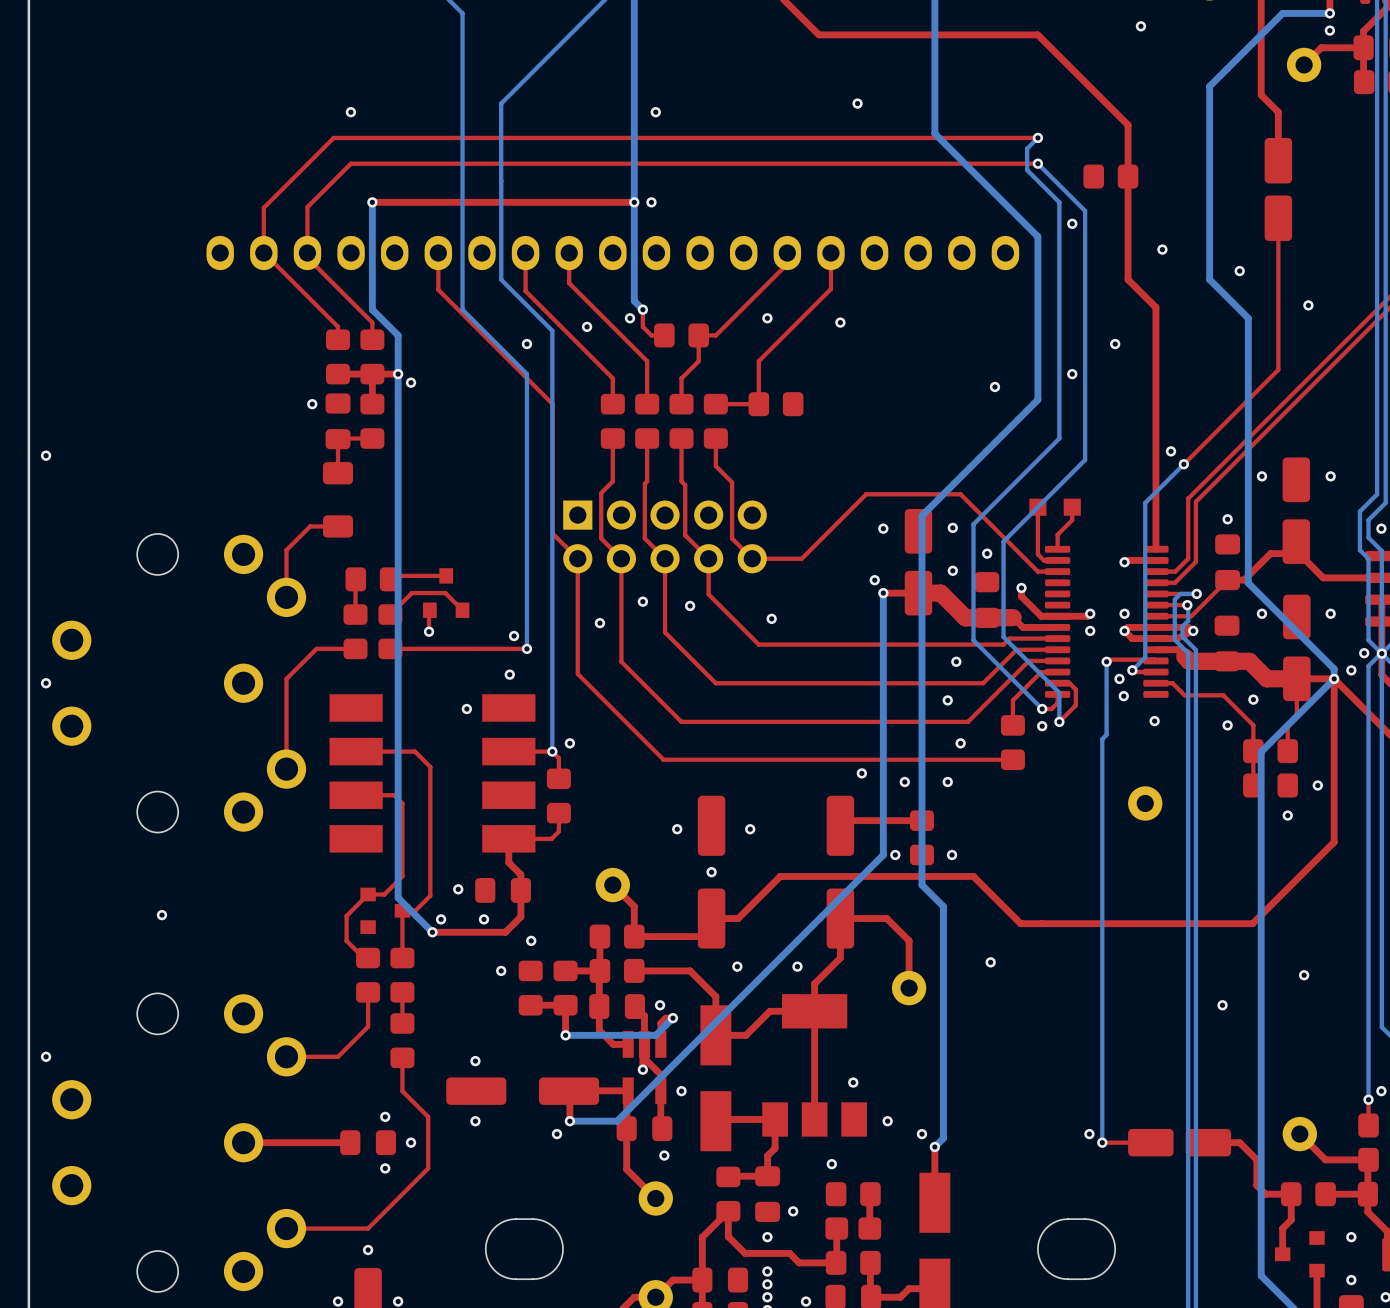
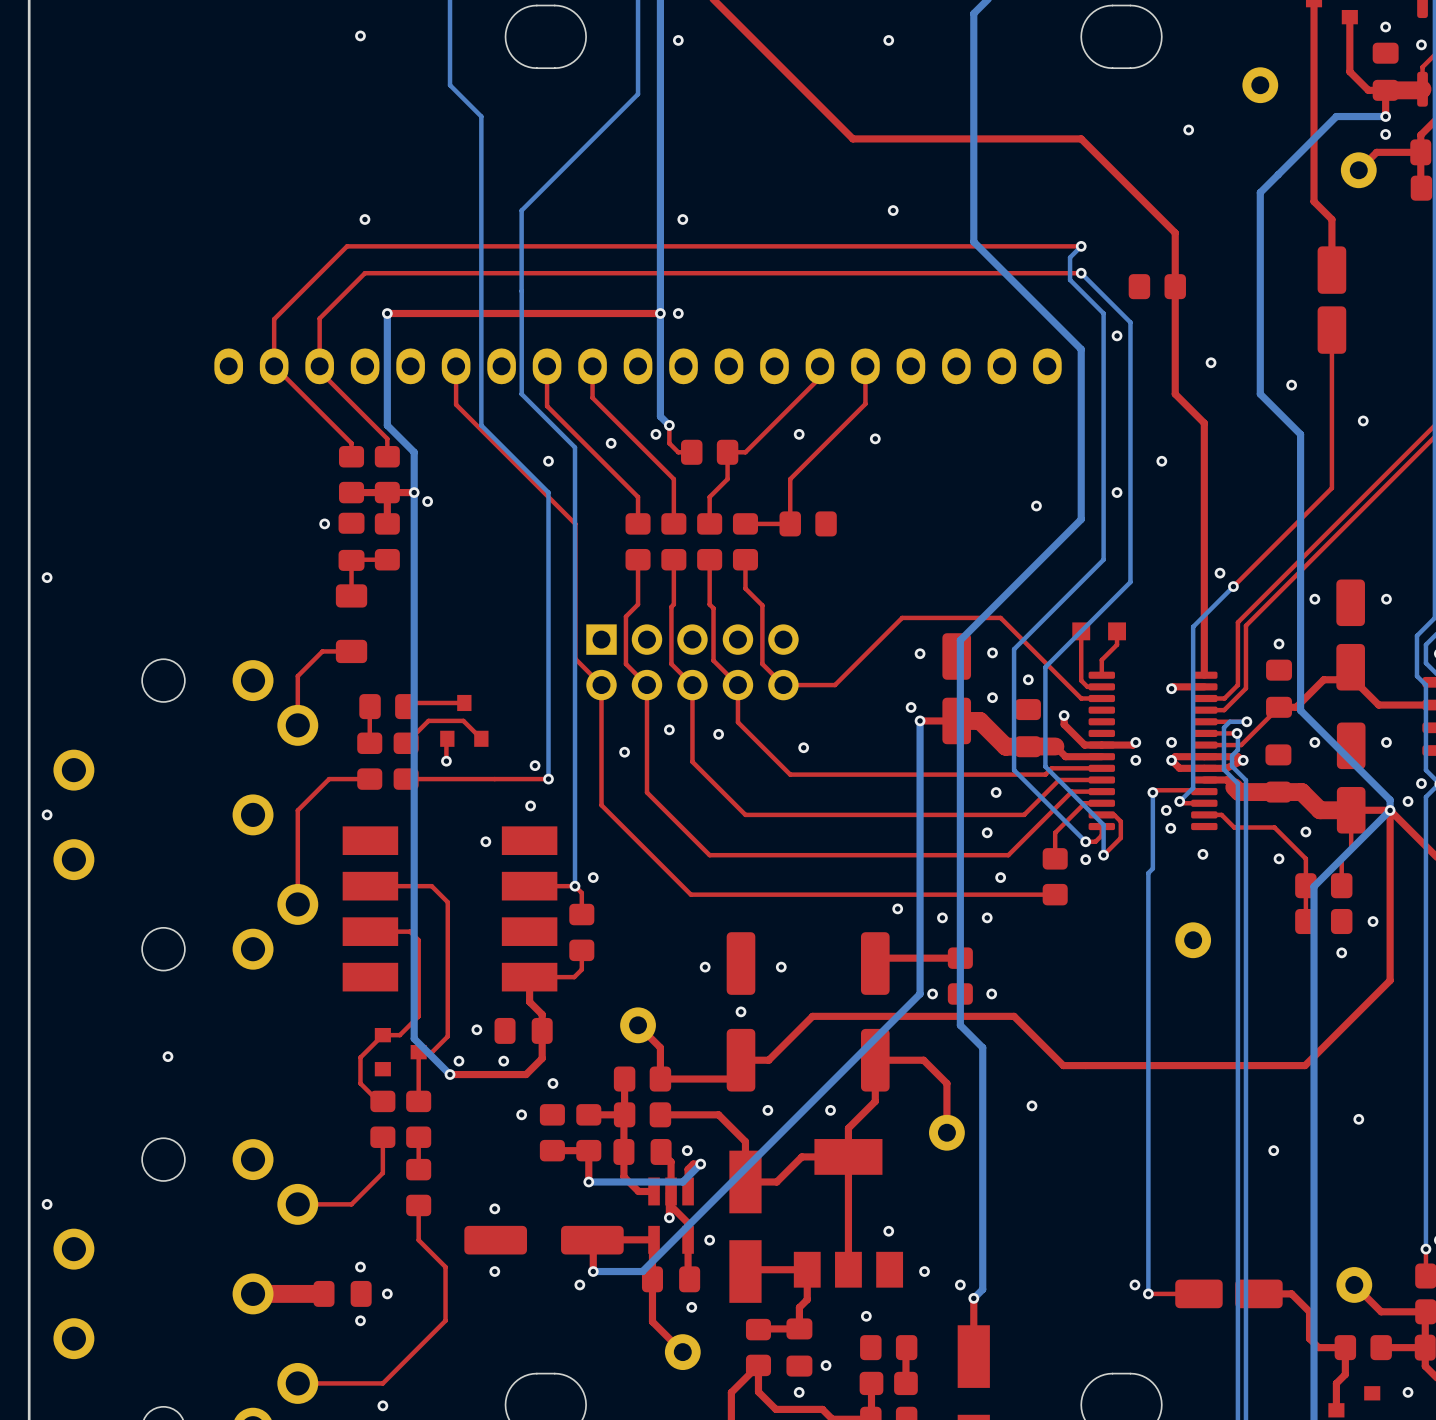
via: none -> (360, 1267)
via: (385, 1116) -> none
top track width: thin (311, 1142) (243, 1142) -> thick (323, 1293) (253, 1293)
top track: (350, 1142) (311, 1142) -> none
part position: (368, 1142) -> (342, 1293)
via: none -> (387, 1293)
via: (411, 1142) -> none
via: none -> (360, 1320)
via: (385, 1168) -> none

